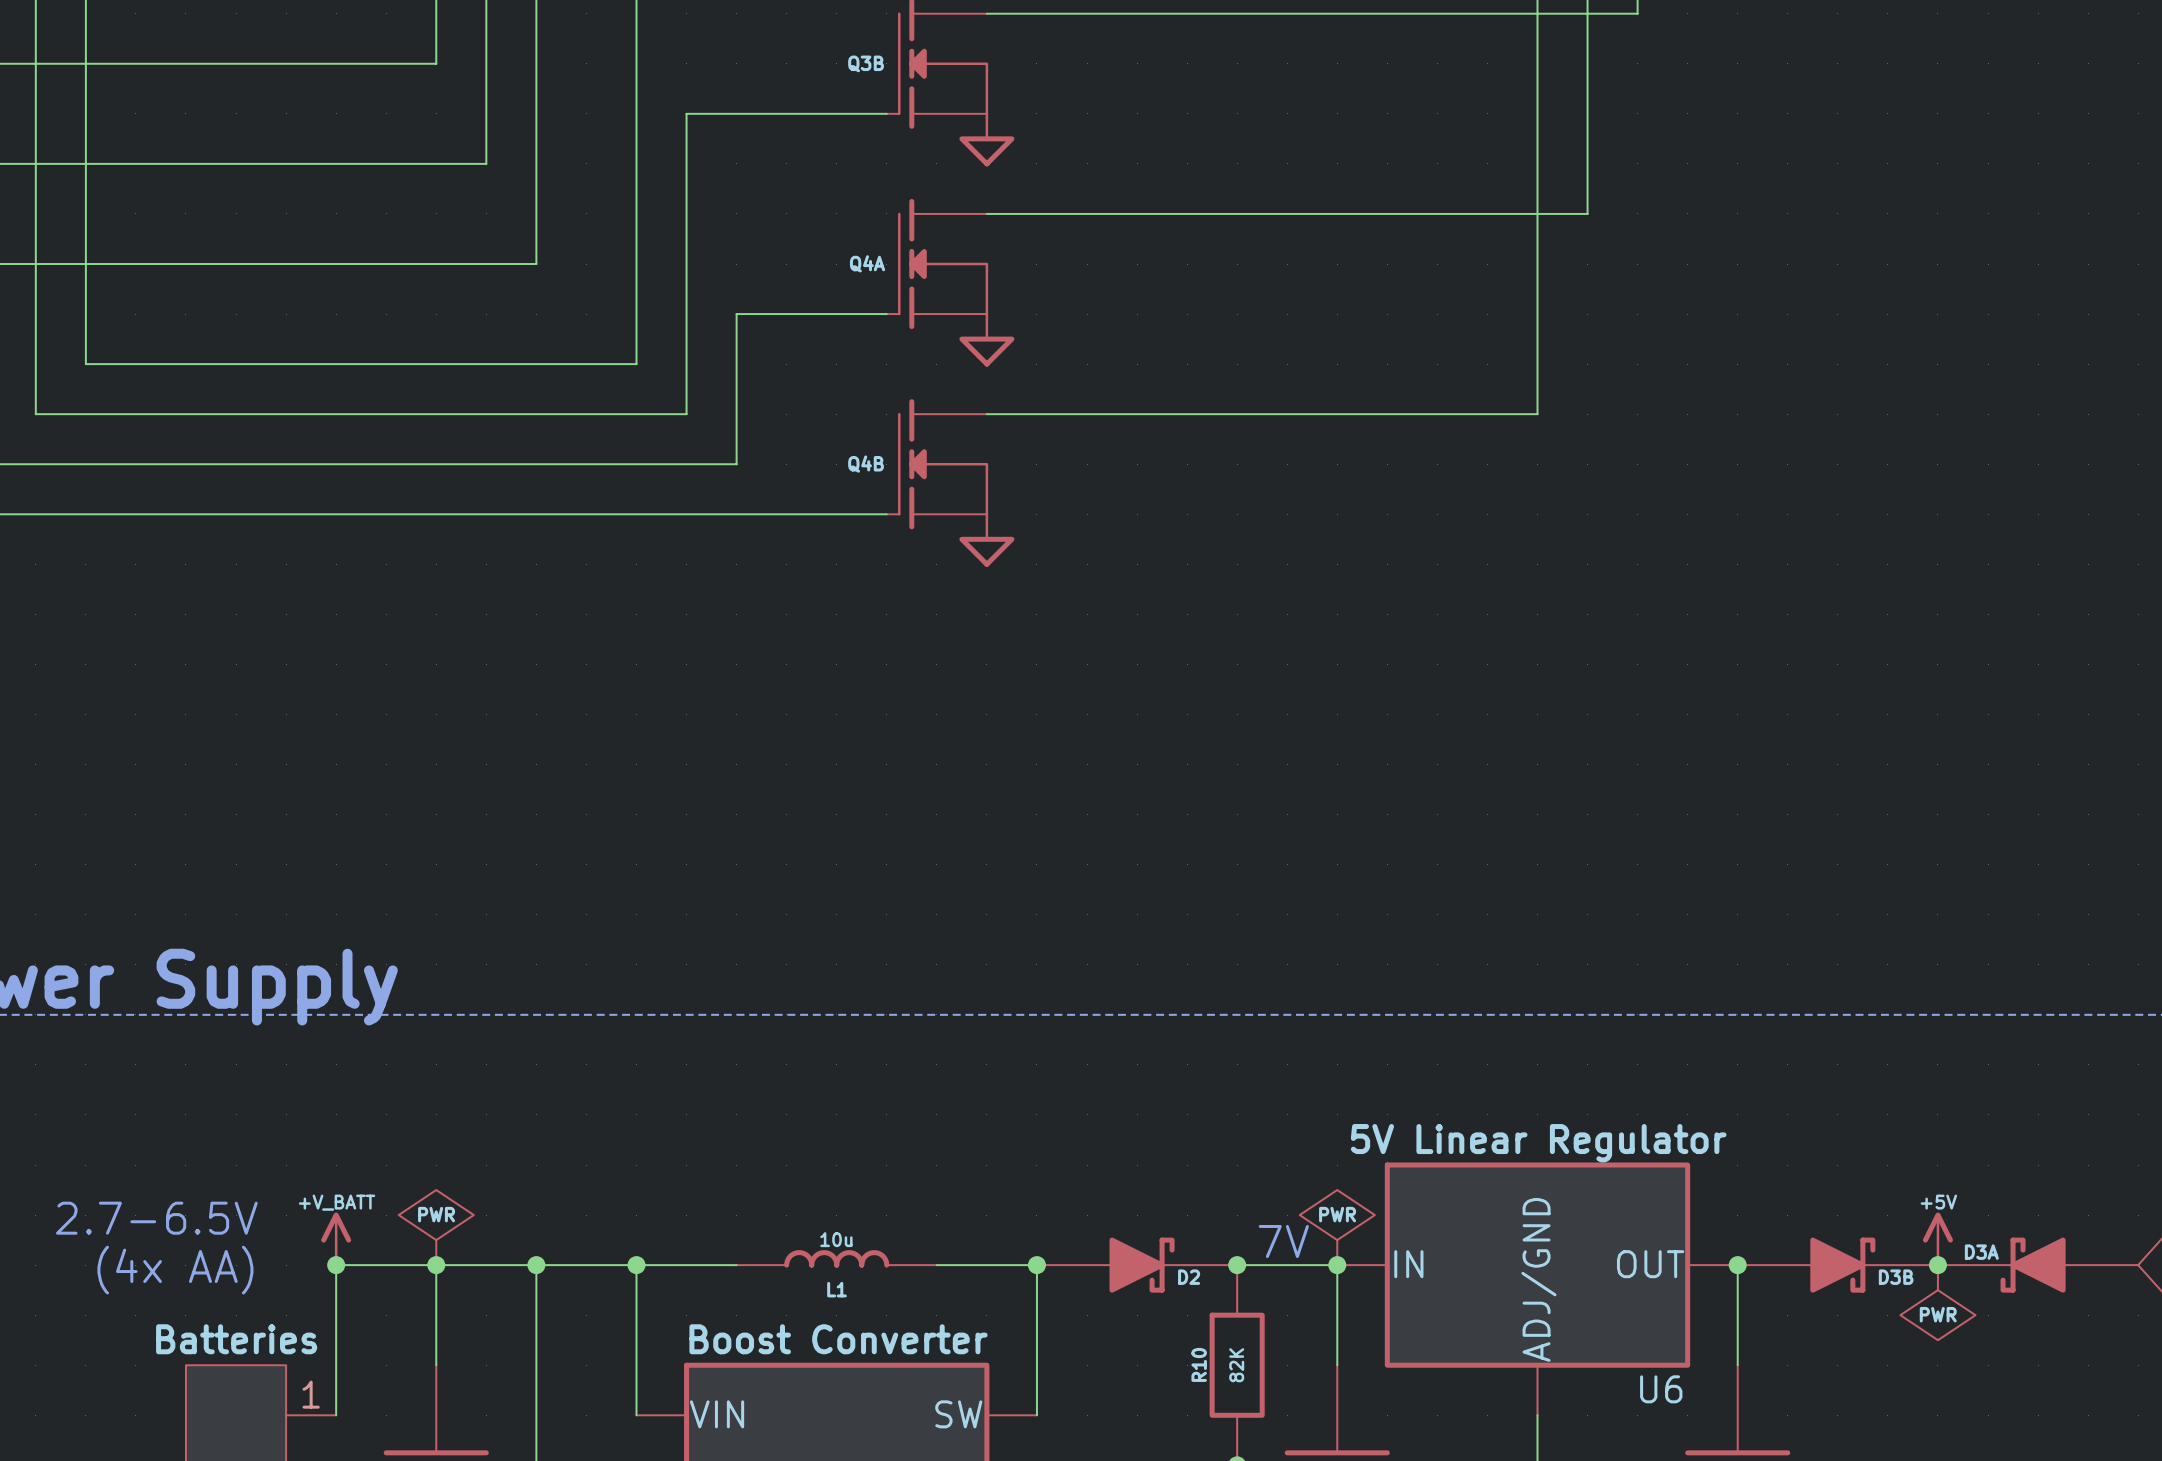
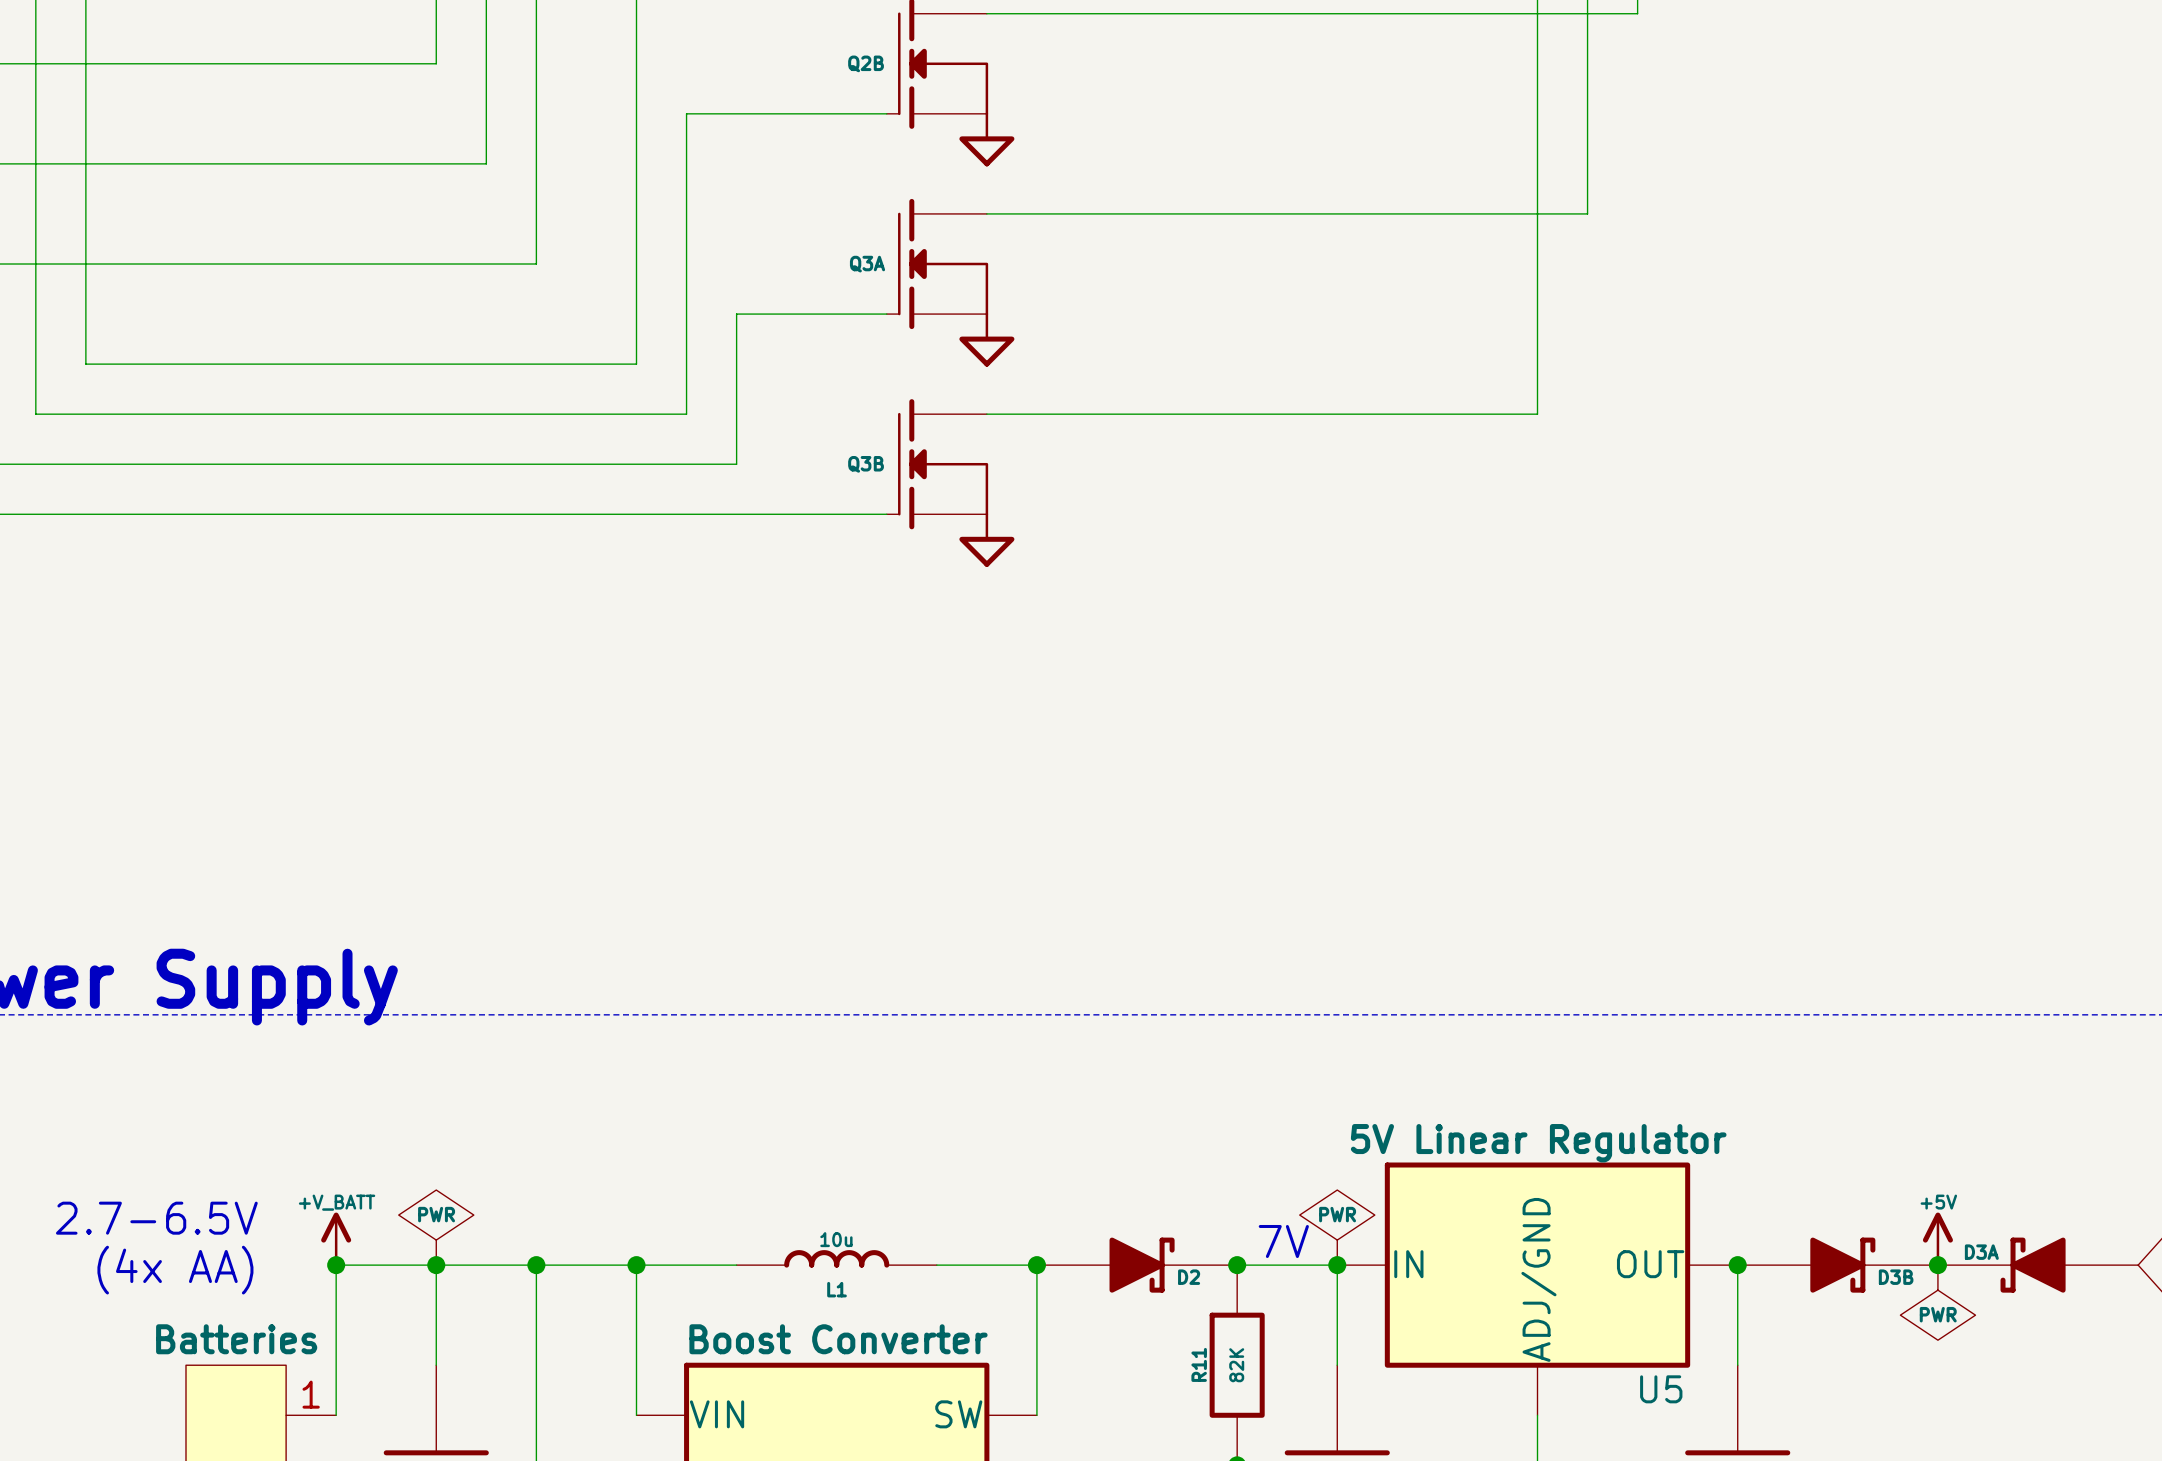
Q3B name: Q3B (866, 63) -> Q2B (866, 63)
Q4A name: Q4A (867, 263) -> Q3A (867, 264)
Q4B name: Q4B (866, 464) -> Q3B (866, 464)
R10 name: R10 (1199, 1364) -> R11 (1199, 1364)
U6 name: U6 (1661, 1389) -> U5 (1661, 1389)

